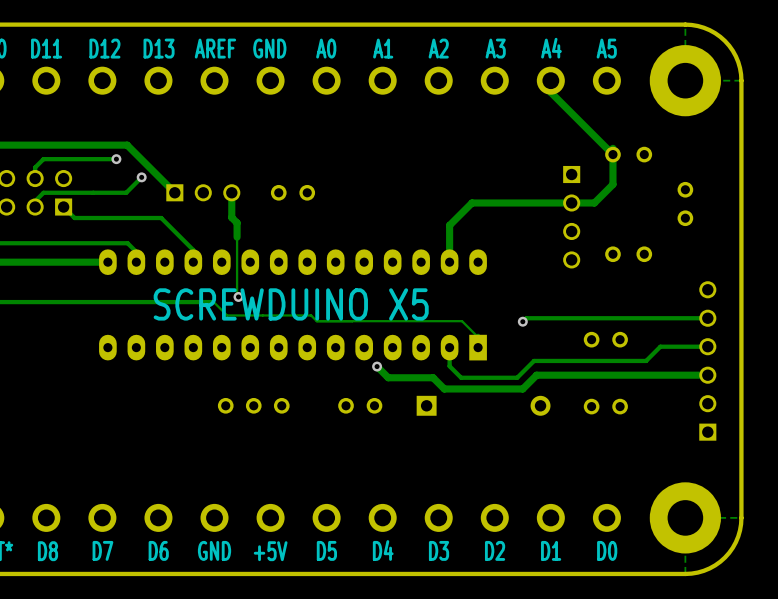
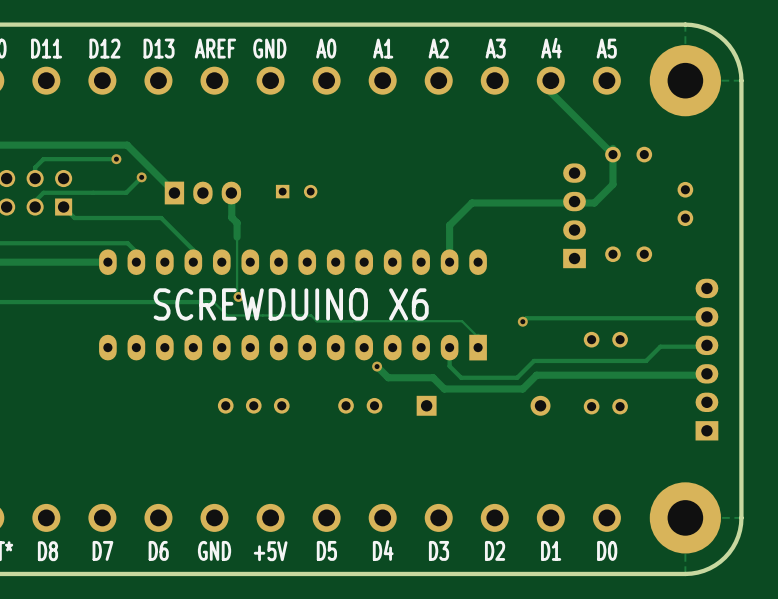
part footprint: [563, 165, 581, 269] -> [563, 163, 586, 269]
part footprint: [166, 184, 241, 202] -> [164, 181, 242, 205]
part footprint: [270, 184, 316, 201] -> [275, 184, 318, 199]
part footprint: [699, 281, 717, 441] -> [695, 278, 719, 441]
text: SCREWDUINO X5 (291, 304) -> SCREWDUINO X6 (291, 304)

